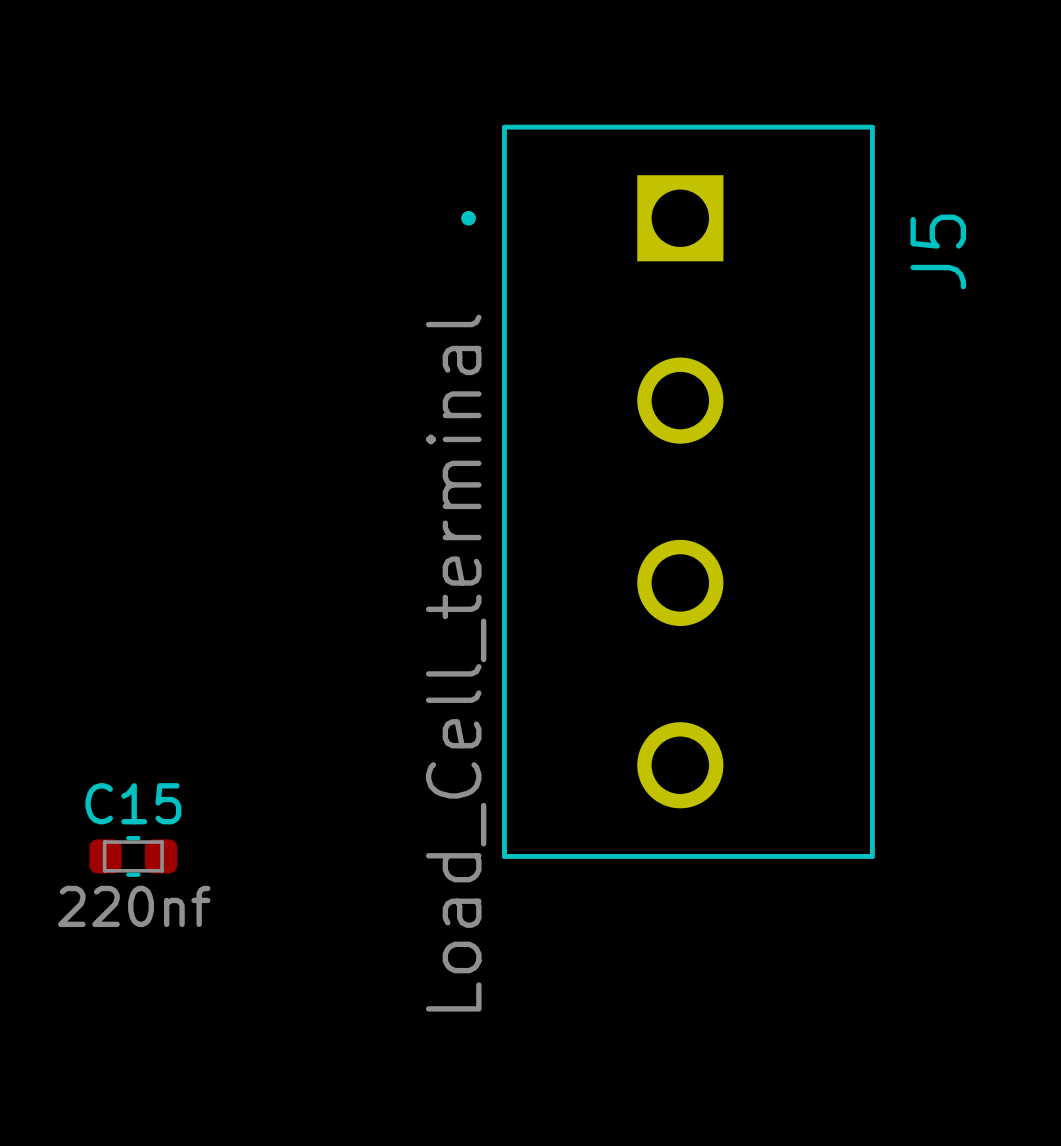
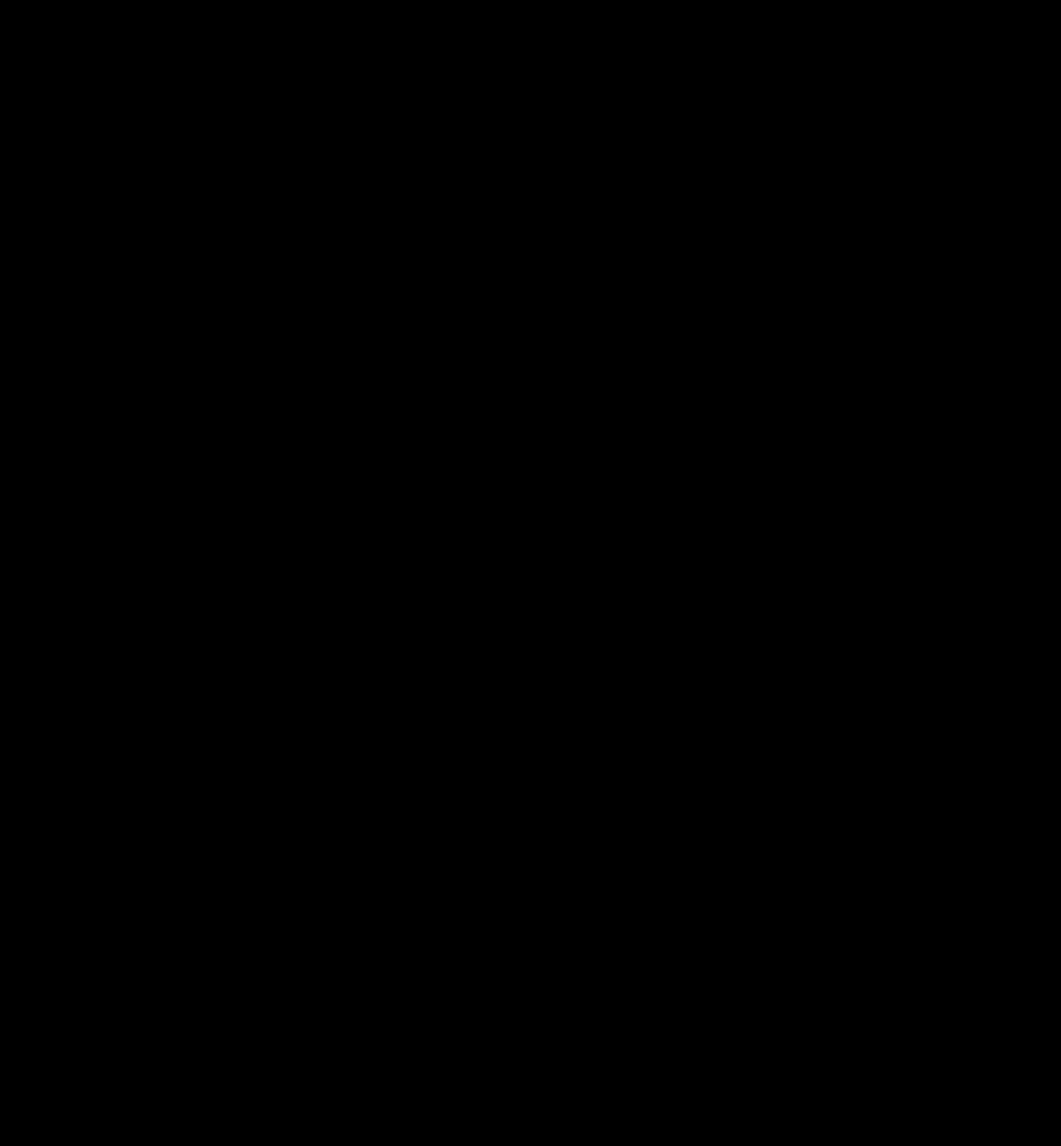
J5: Load_Cell_terminal (668, 491) -> none
C15: 220nf (133, 856) -> none

